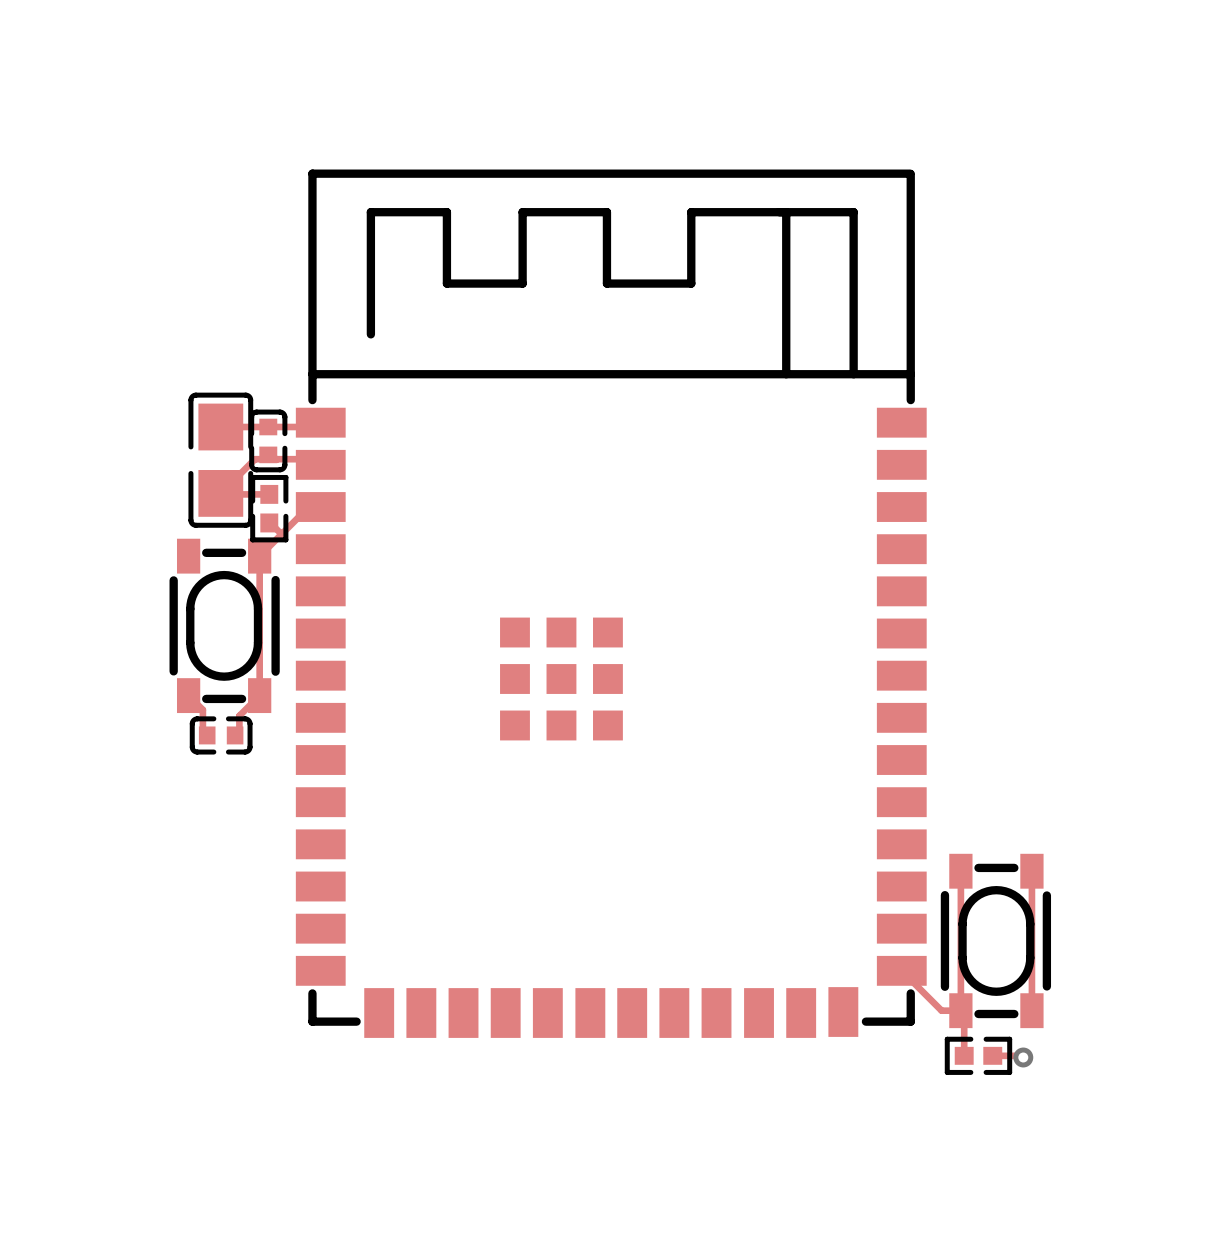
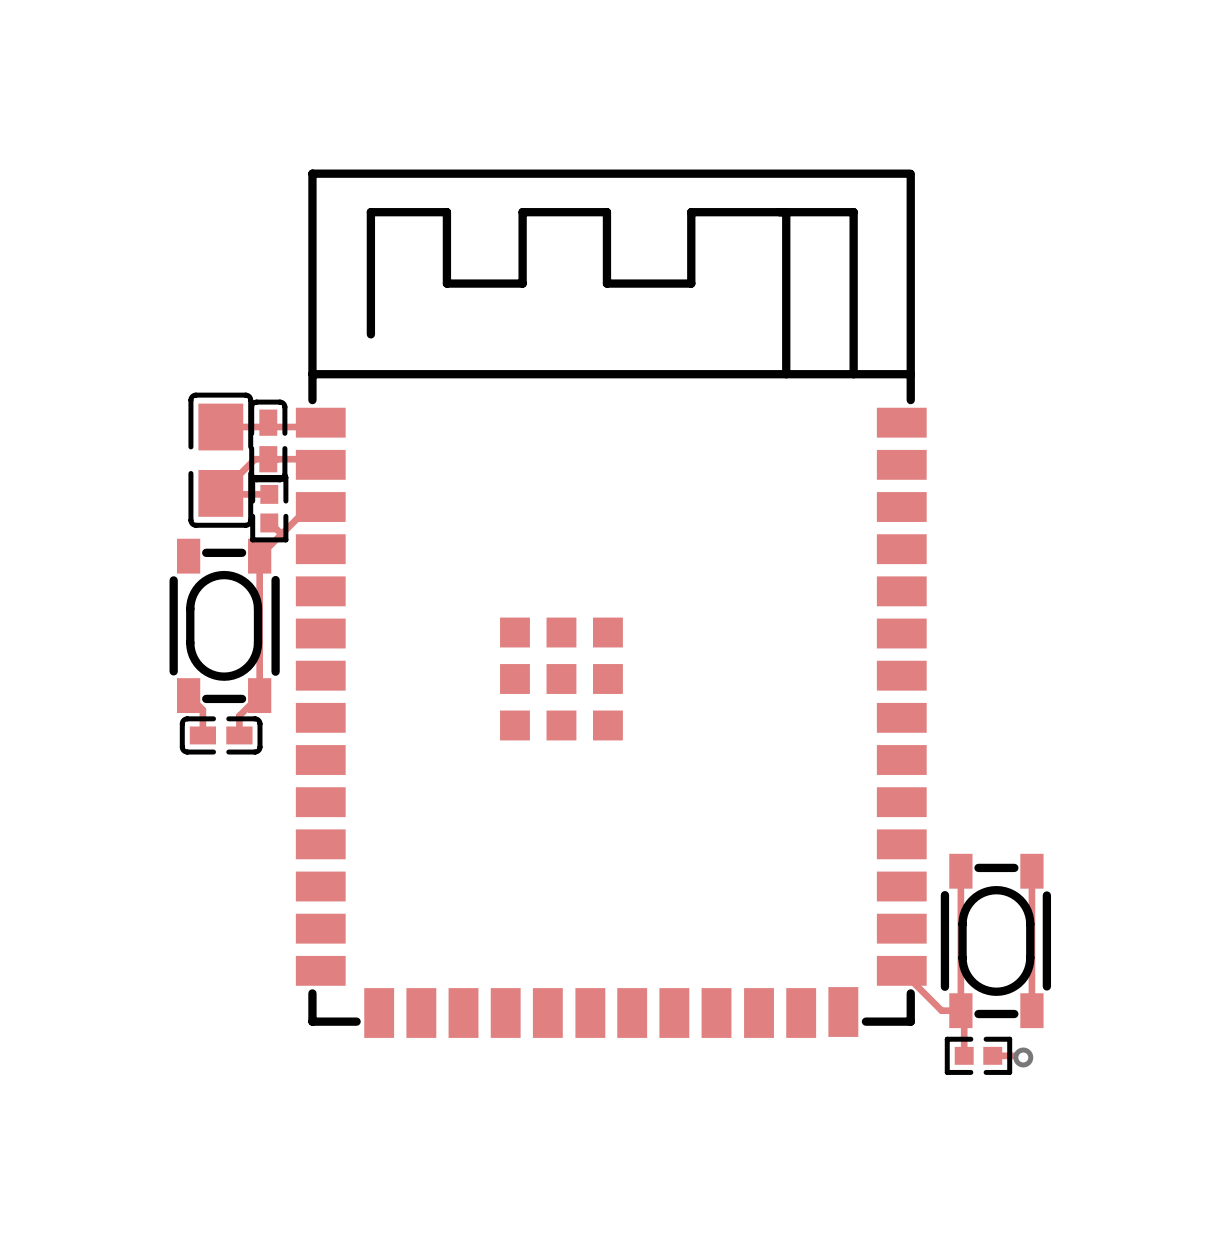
part footprint: [249, 409, 288, 473] -> [249, 399, 288, 483]
part footprint: [189, 716, 253, 755] -> [179, 716, 263, 755]

